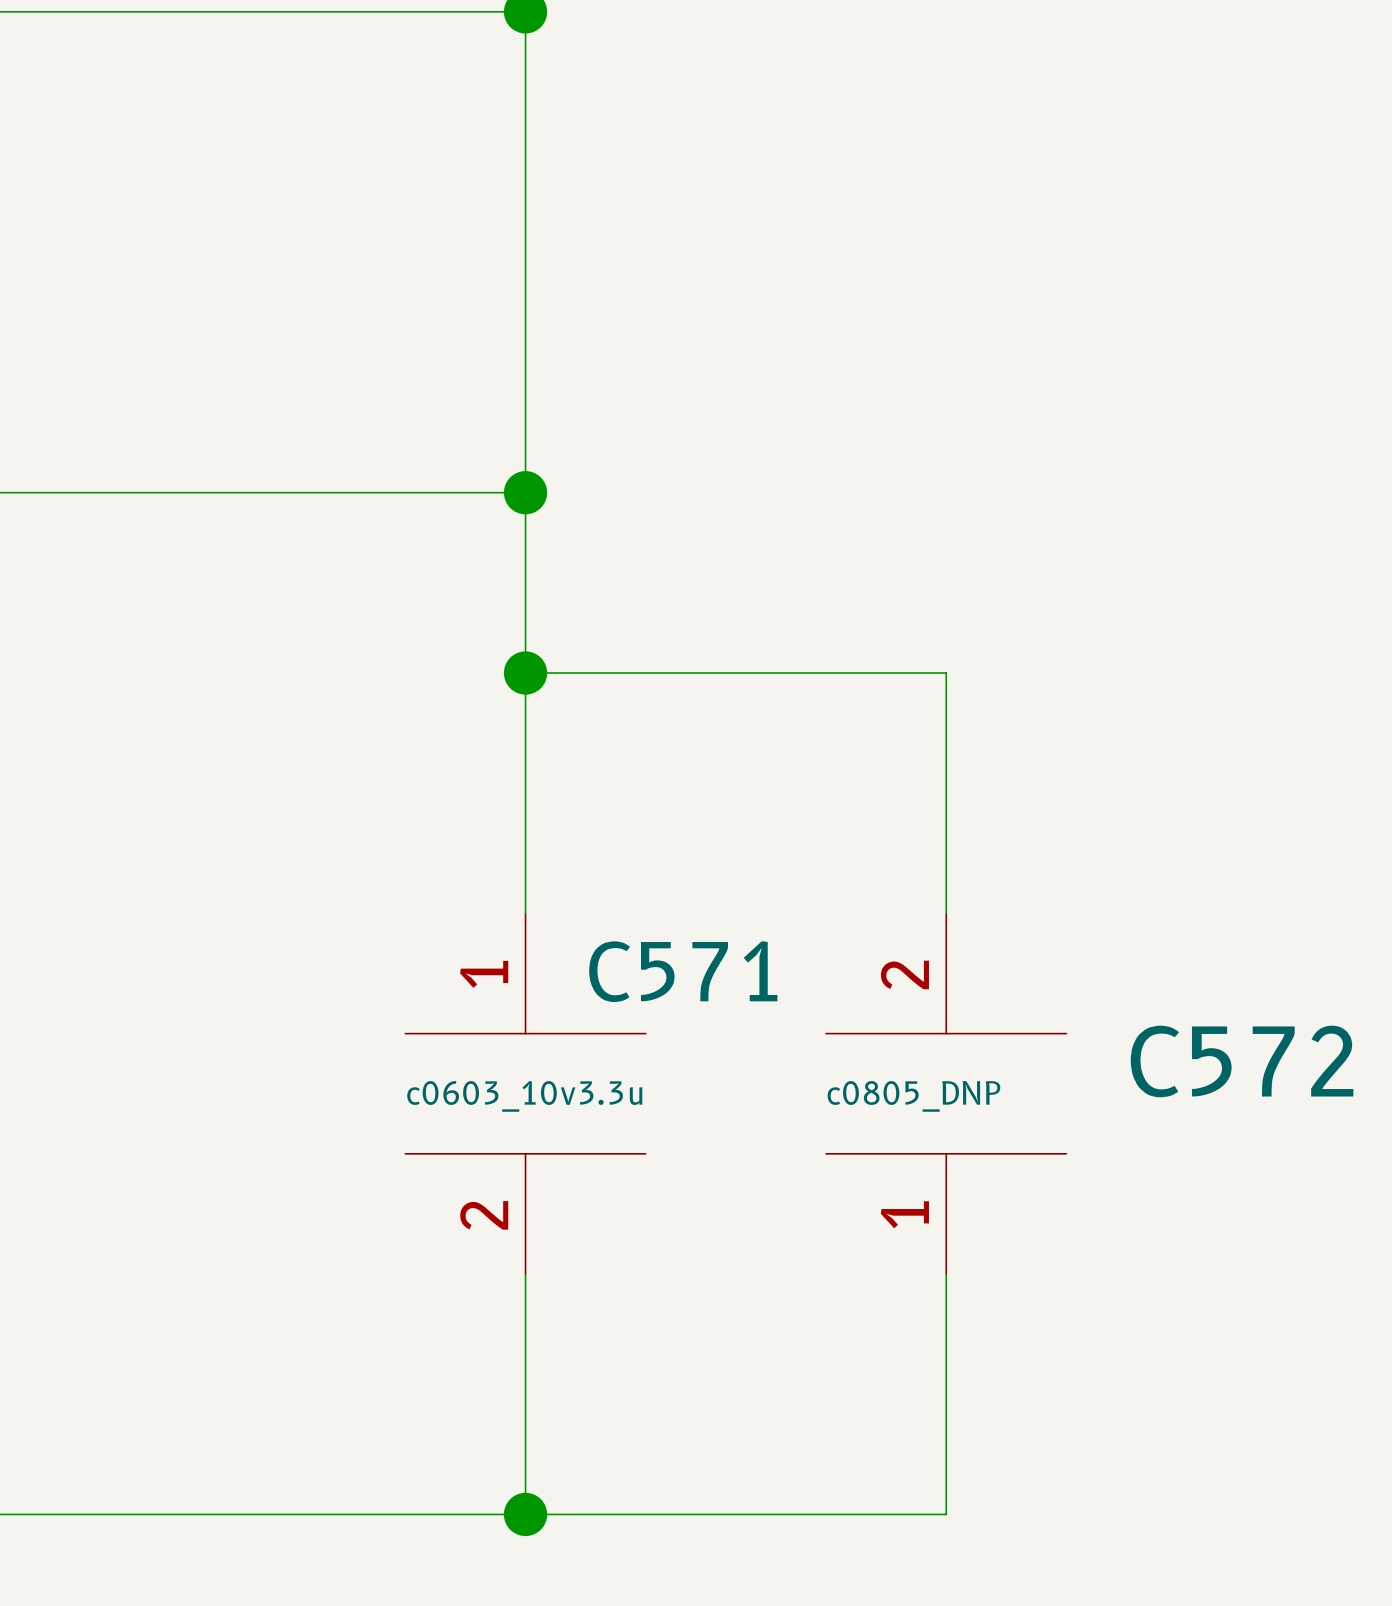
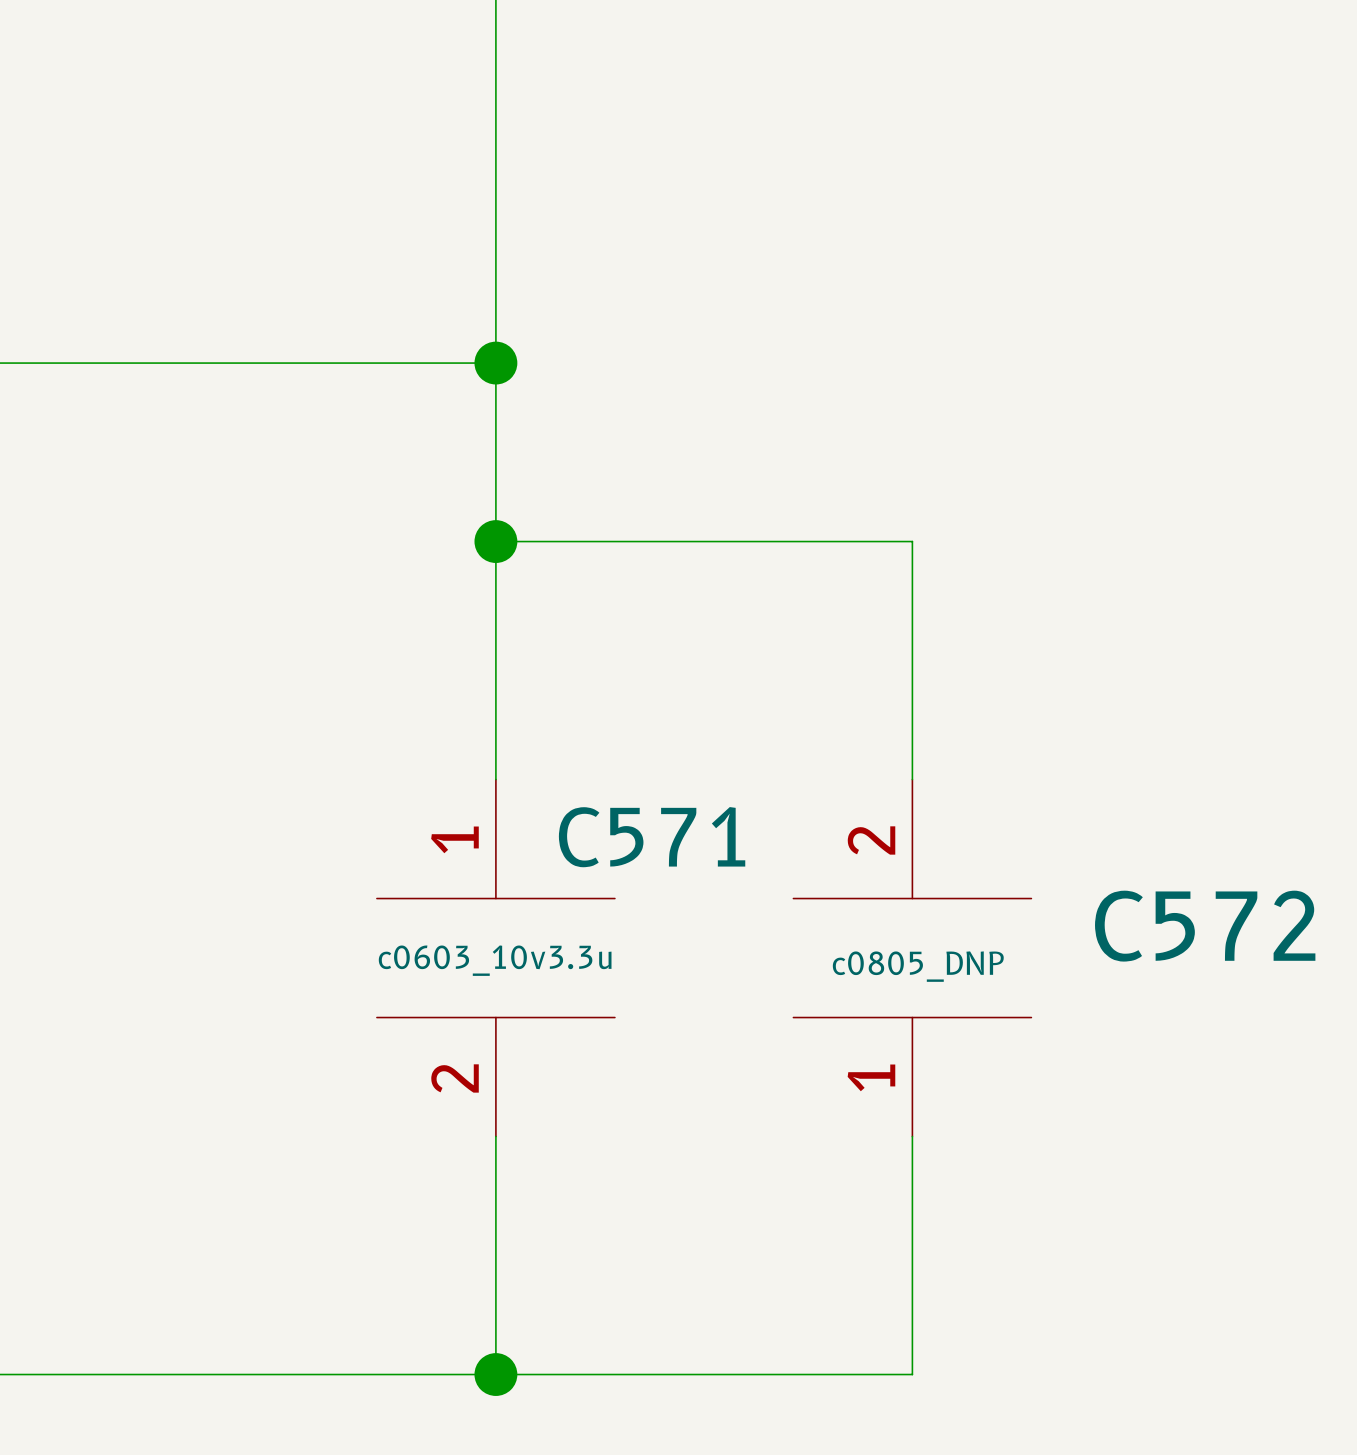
C572 value position: c0805_DNP (913, 1096) -> c0805_DNP (918, 966)

